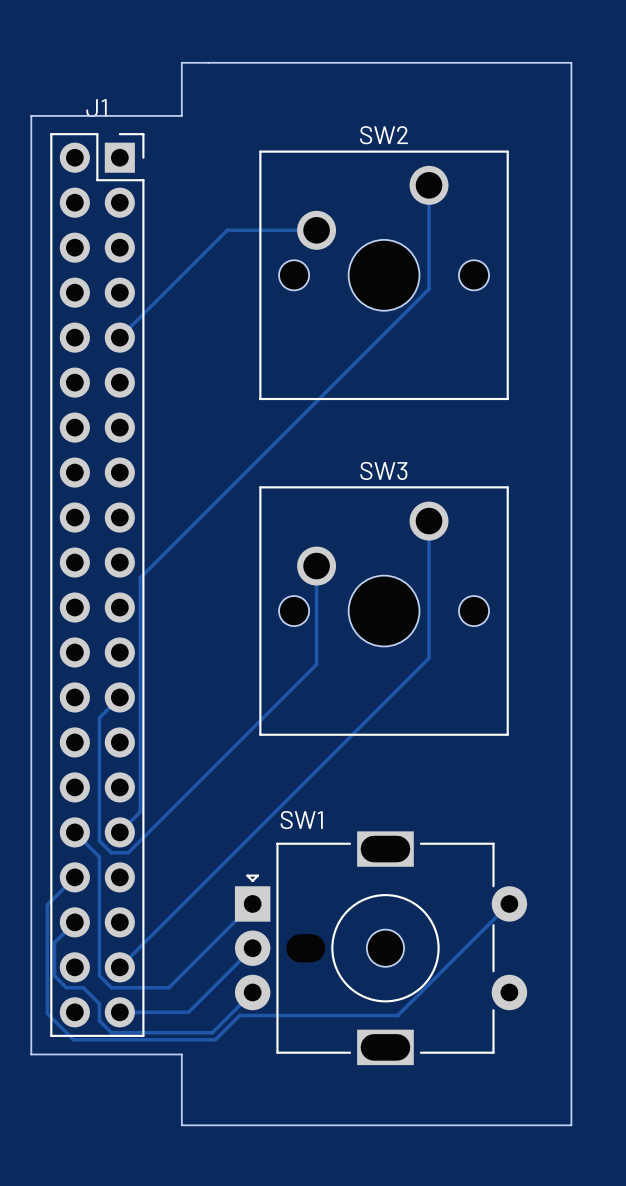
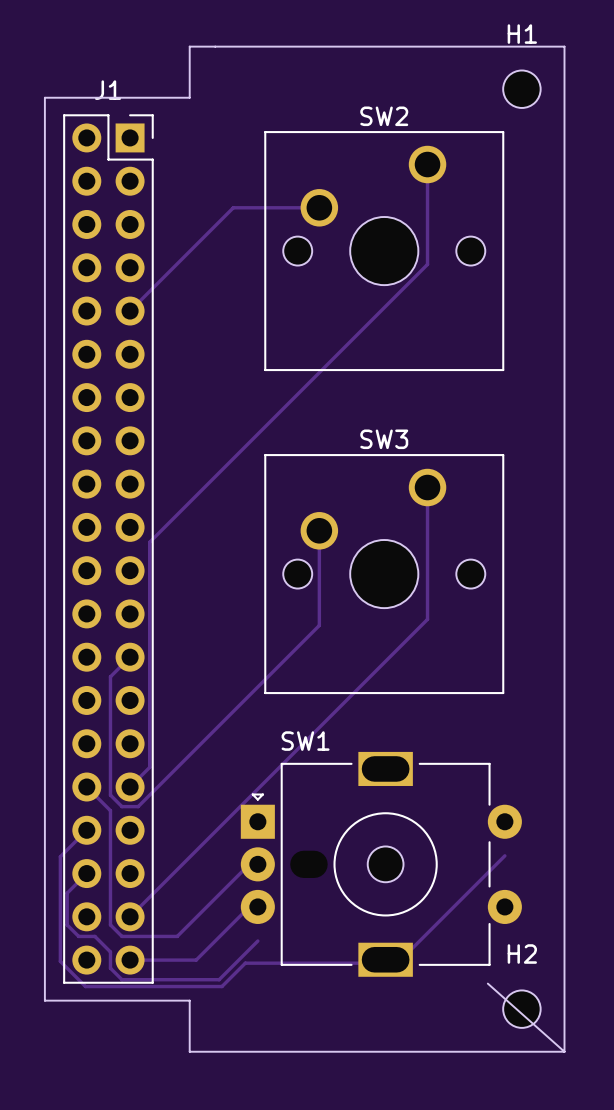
H1: none -> (521, 89)
SW1 position: (381, 948) -> (381, 864)
H2: none -> (521, 1009)
board edge: (181, 1107) (181, 1125) (571, 1125) (571, 1107) -> (189, 1051) (564, 1051) (487, 983)

